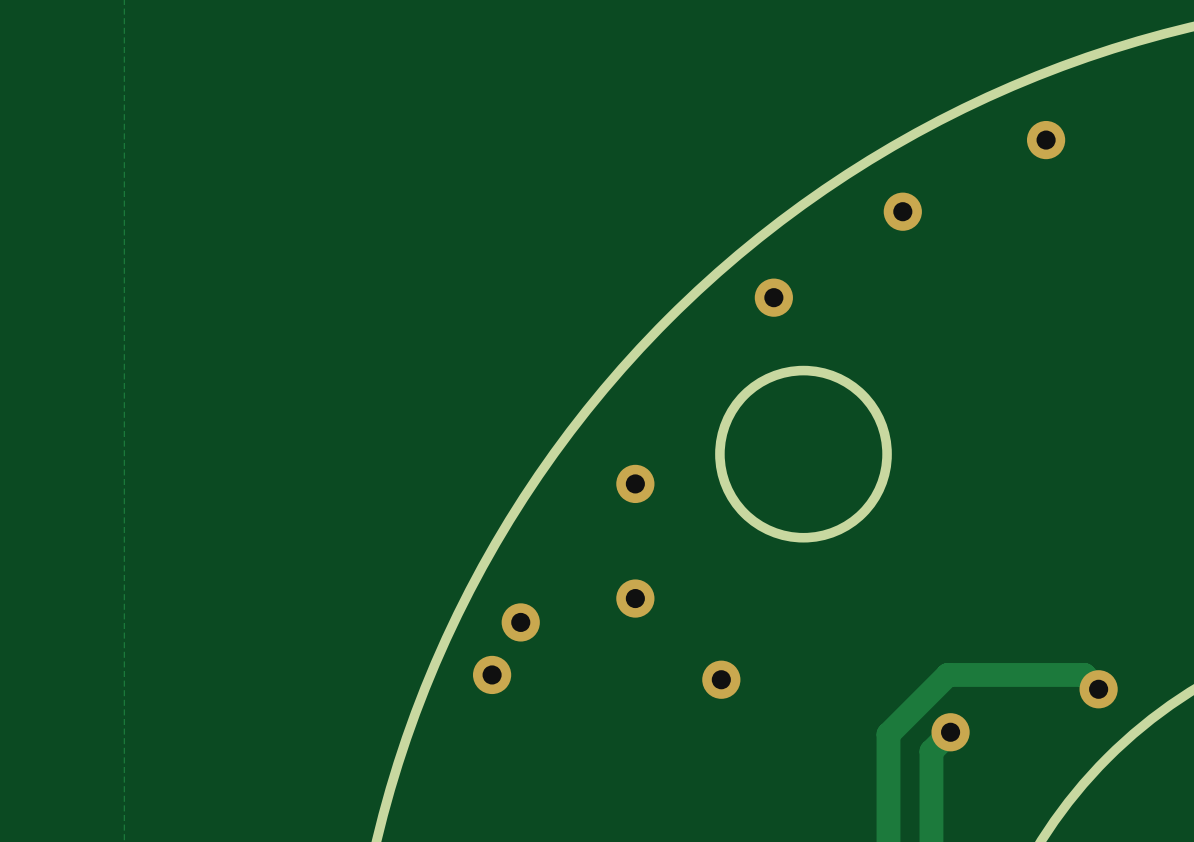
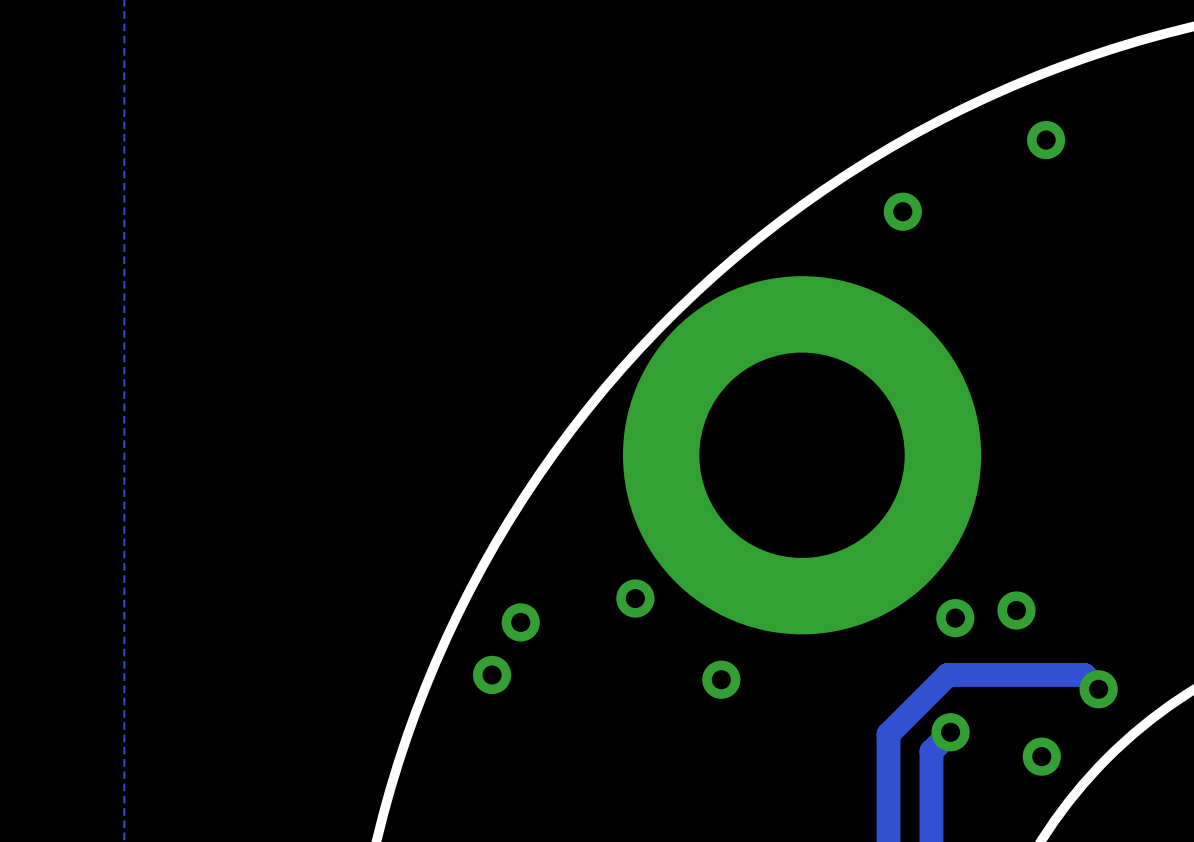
via: (773, 297) -> none
round board edge: [715, 365, 892, 543] -> none
part: none -> (802, 455)
via: (635, 483) -> none
via: none -> (1016, 610)
via: none -> (955, 618)
via: none -> (1041, 756)

